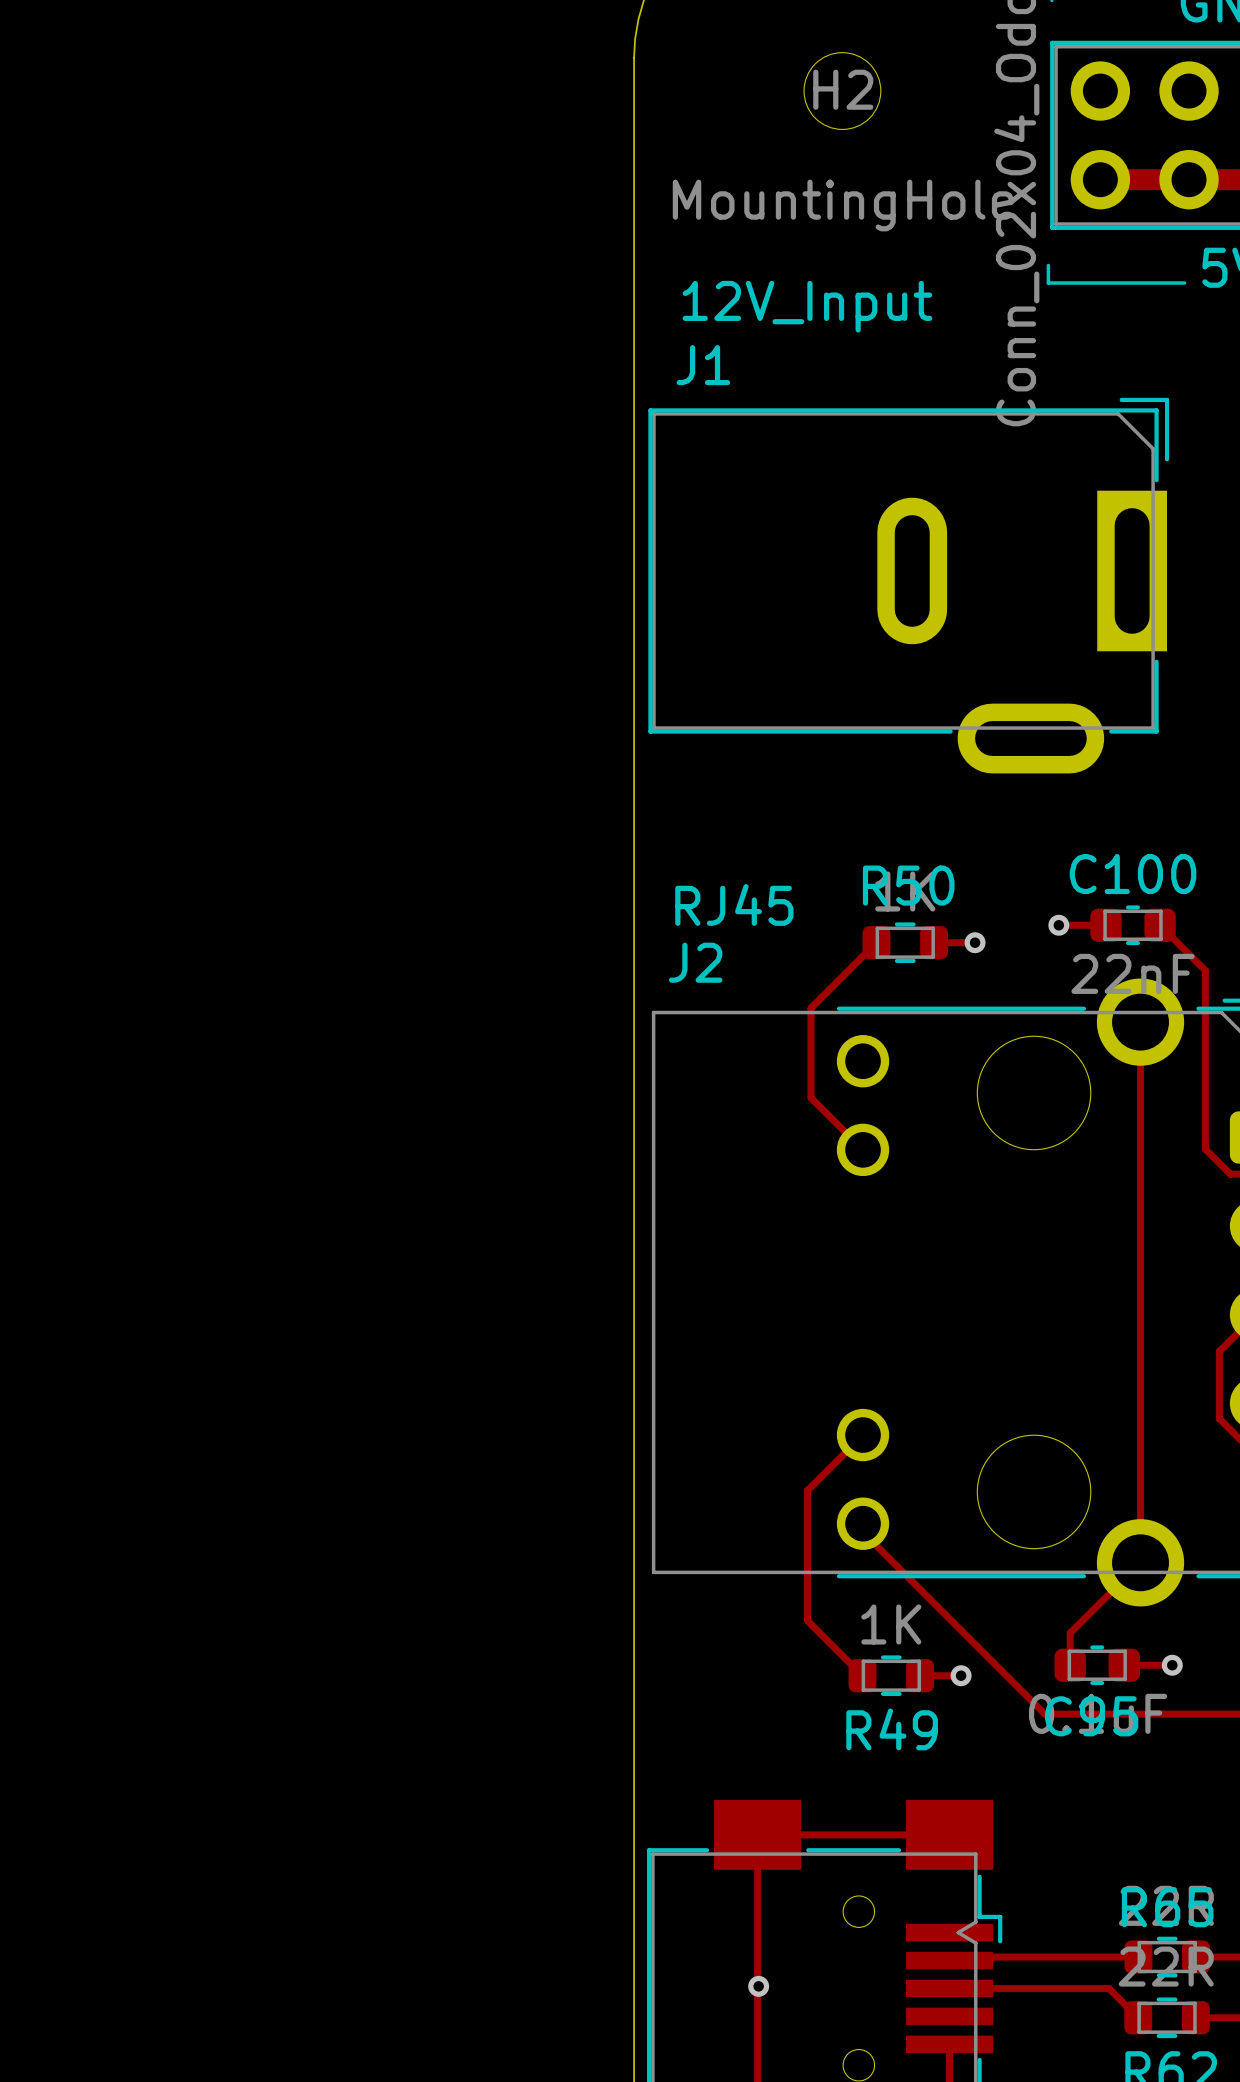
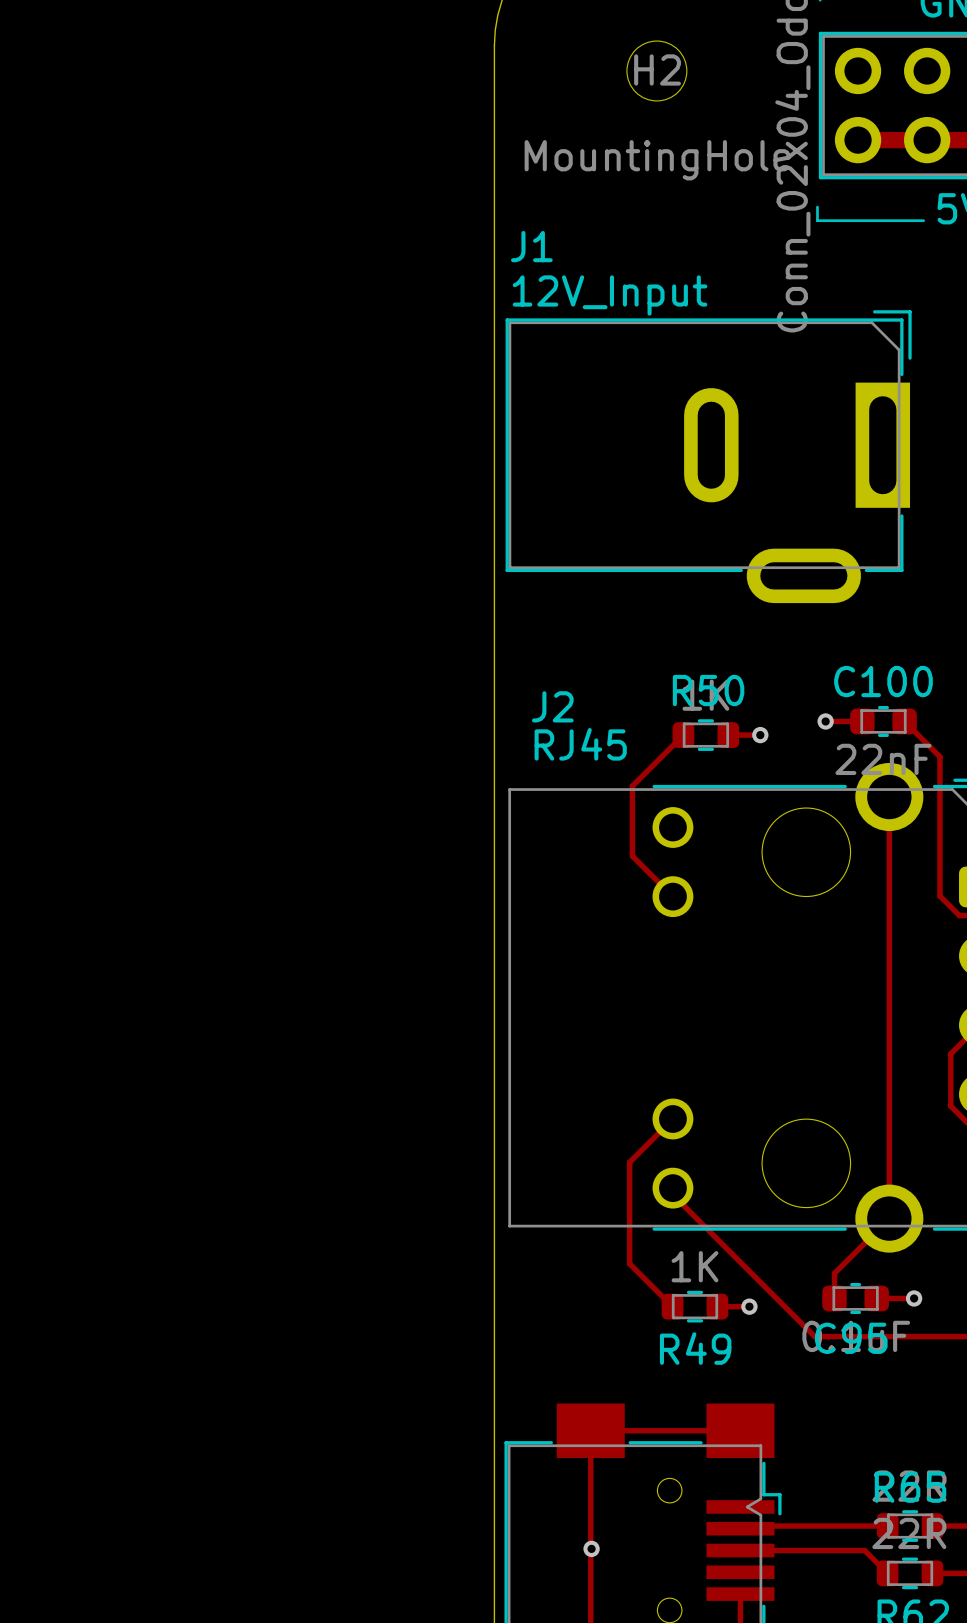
J1 value position: 12V_Input (807, 306) -> 12V_Input (610, 295)
J1 name position: J1 (703, 365) -> J1 (531, 246)
J2 value position: RJ45 (734, 904) -> RJ45 (580, 744)
J2 name position: J2 (695, 962) -> J2 (552, 706)

